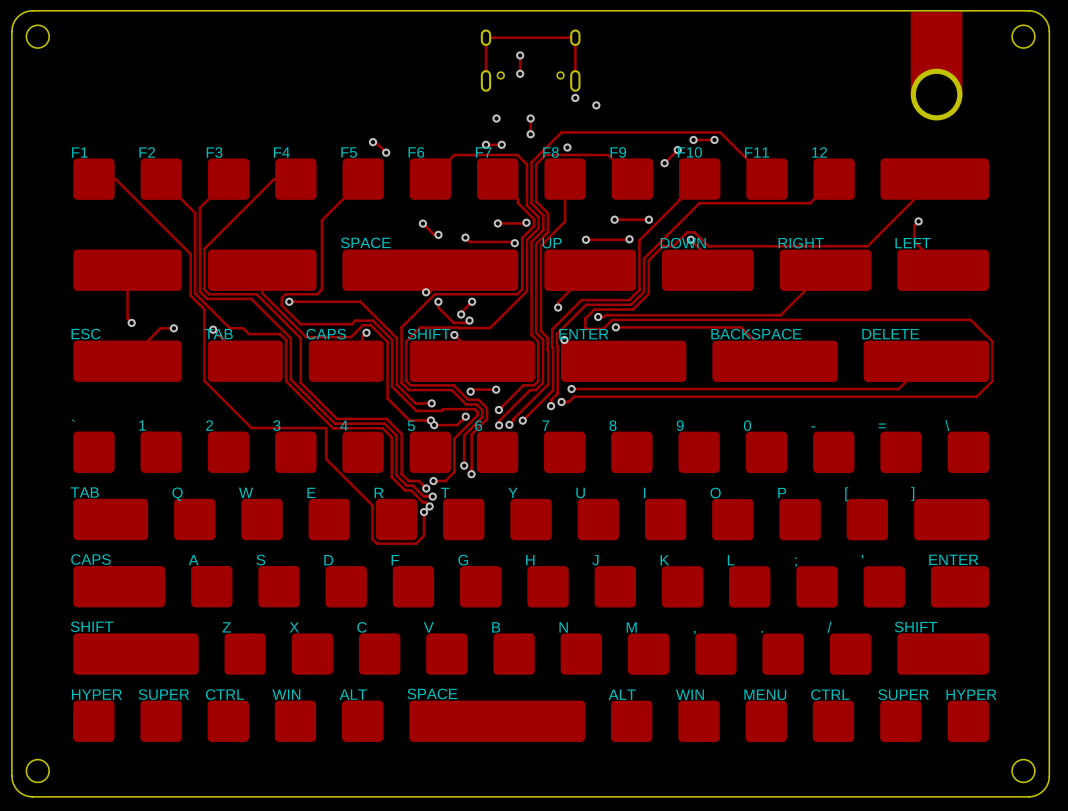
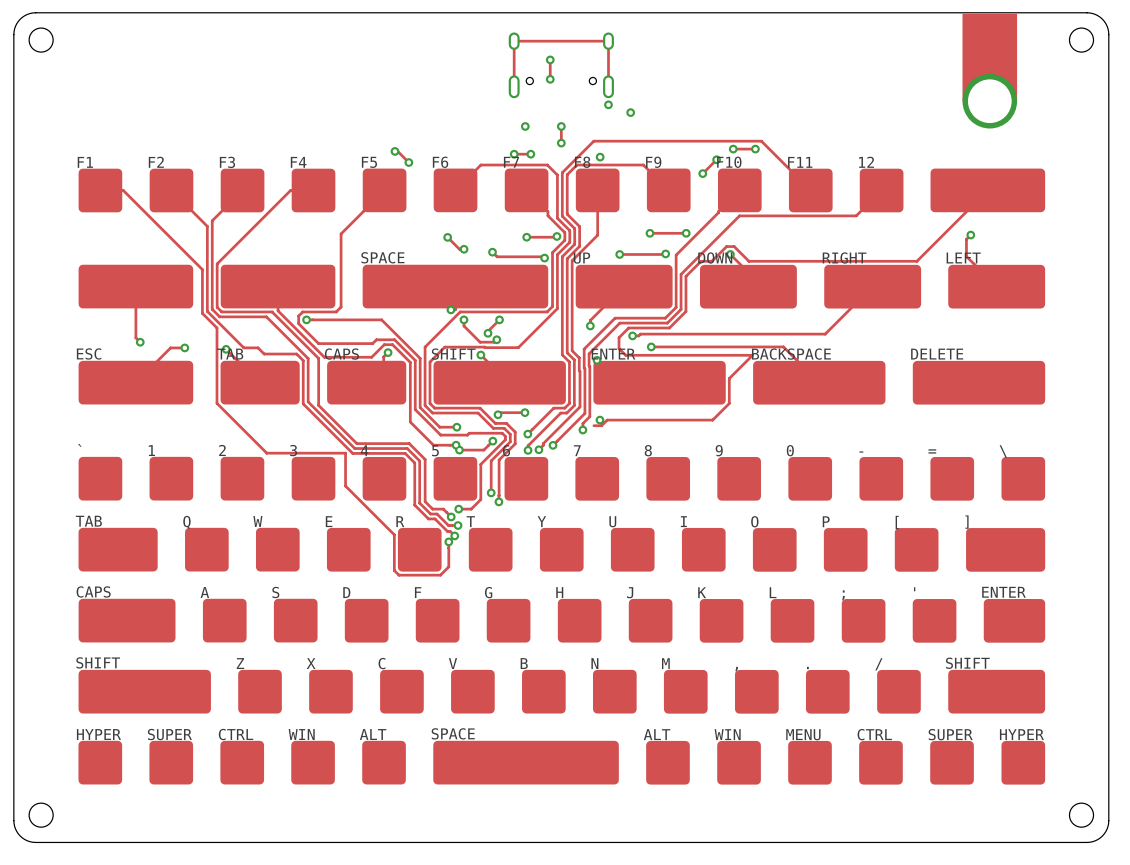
track: (585, 328) (603, 328) (612, 319) (970, 319) (992, 341) (992, 380) (976, 396) (674, 396) -> (619, 348) (625, 355) (752, 355) (729, 378) (729, 403) (712, 420)
track: (926, 361) (898, 389) (571, 389) -> none
via: (571, 389) -> none
via: none -> (599, 420)
via: (561, 402) -> none

